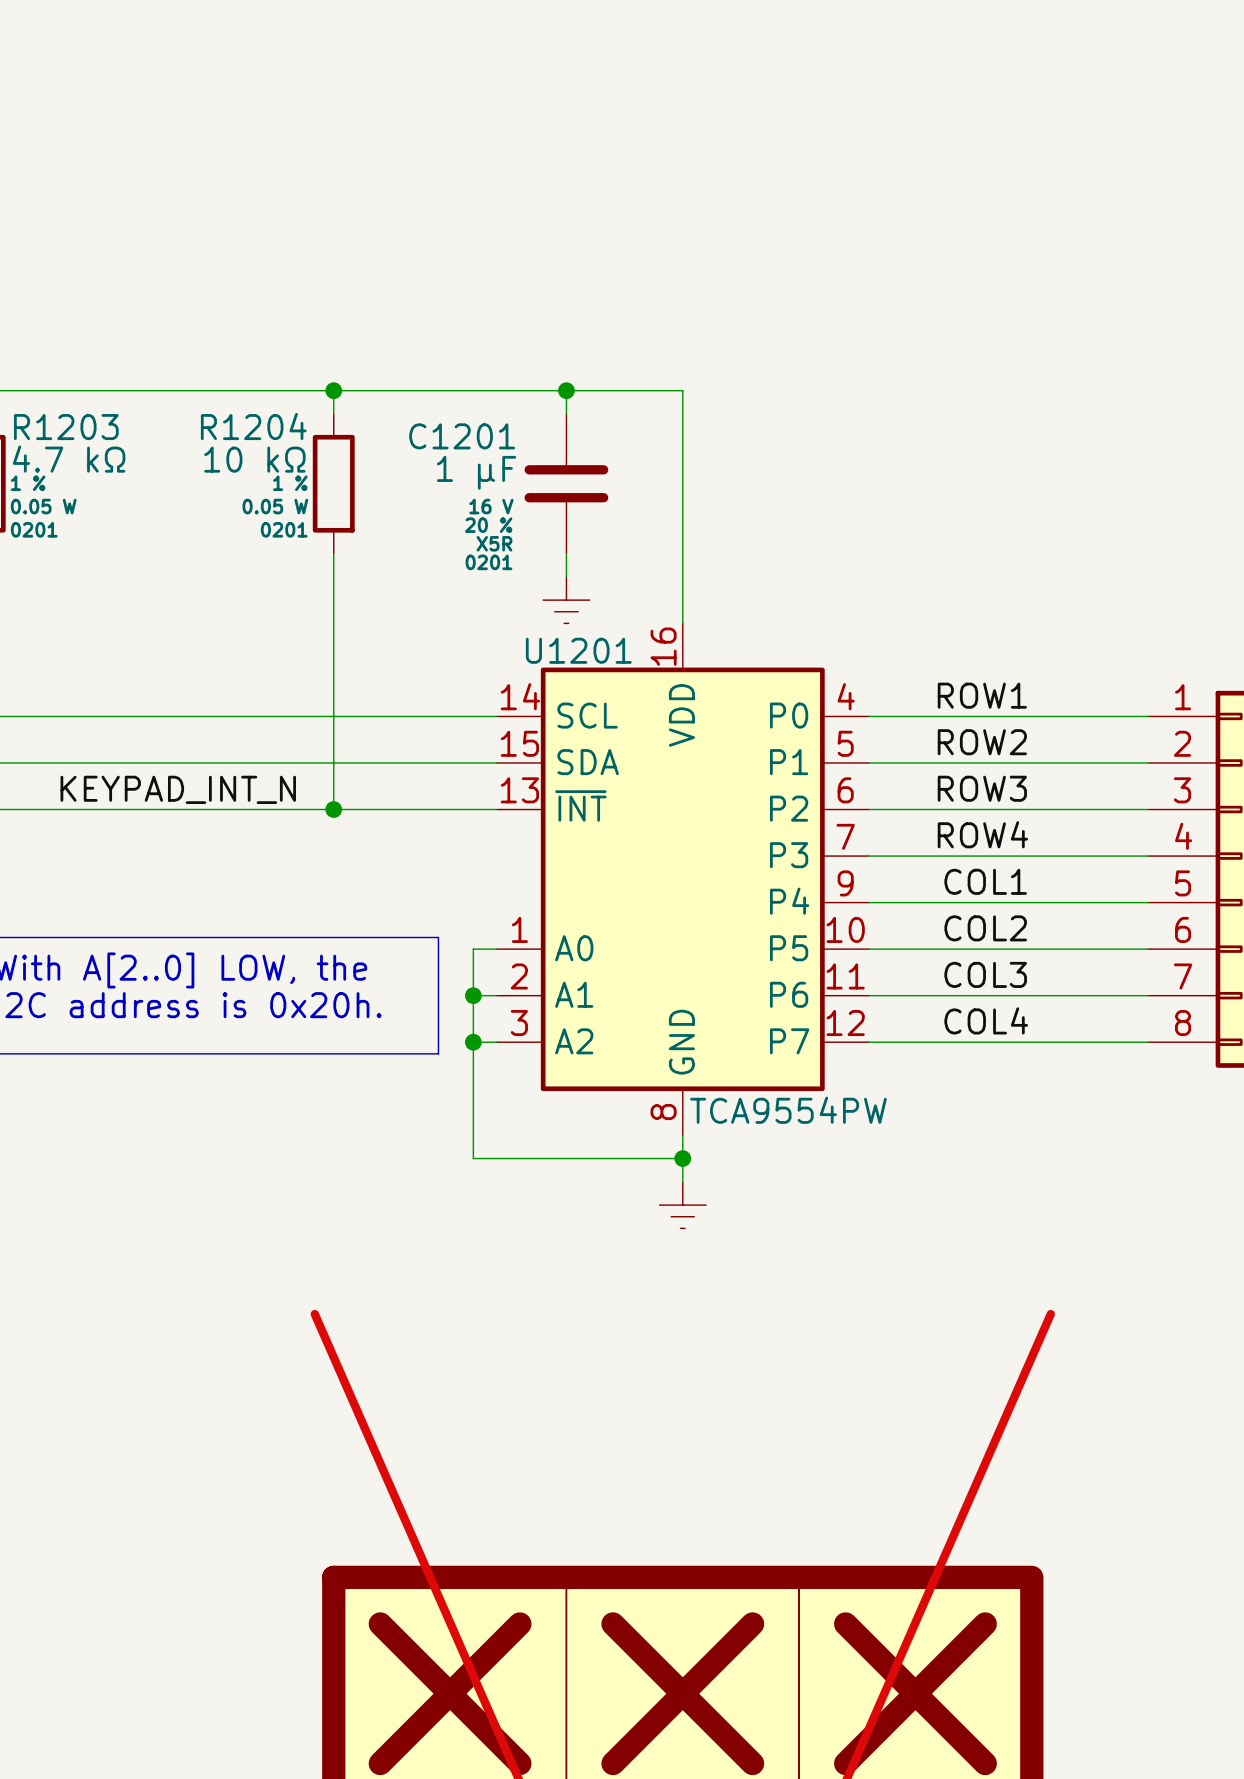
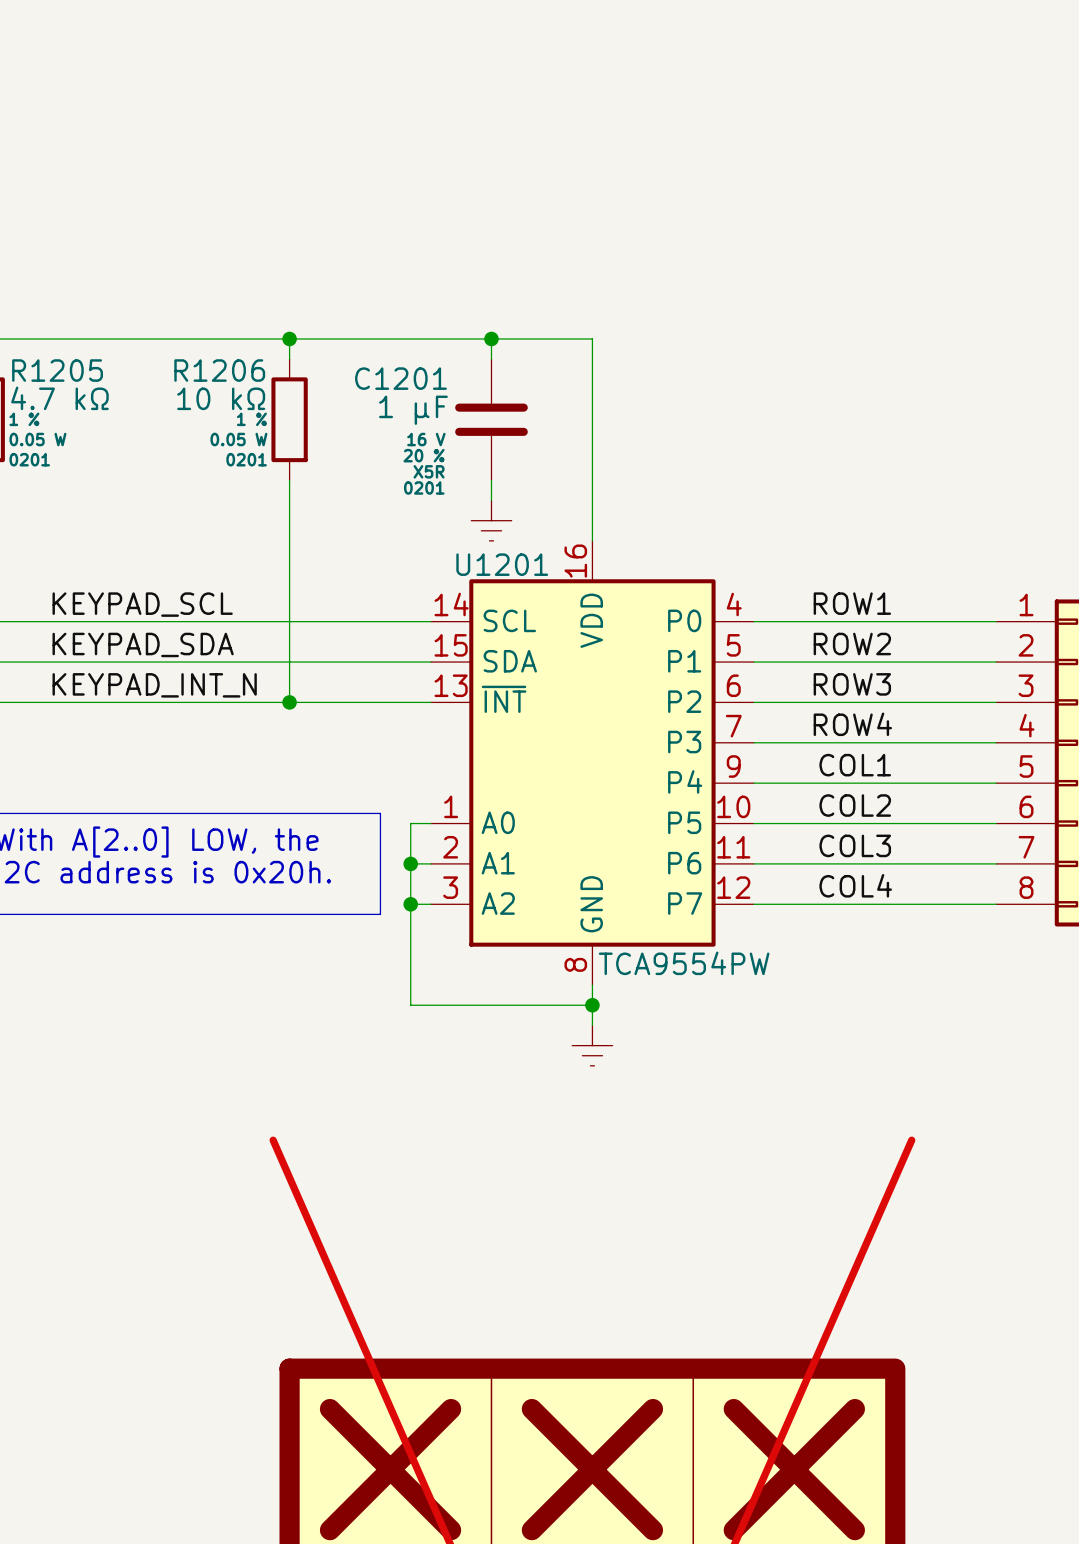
R1204 name: R1204 (253, 426) -> R1206 (219, 370)
R1203 name: R1203 (66, 427) -> R1205 (57, 370)
label: none -> KEYPAD_SCL (142, 604)
label: none -> KEYPAD_SDA (143, 644)

